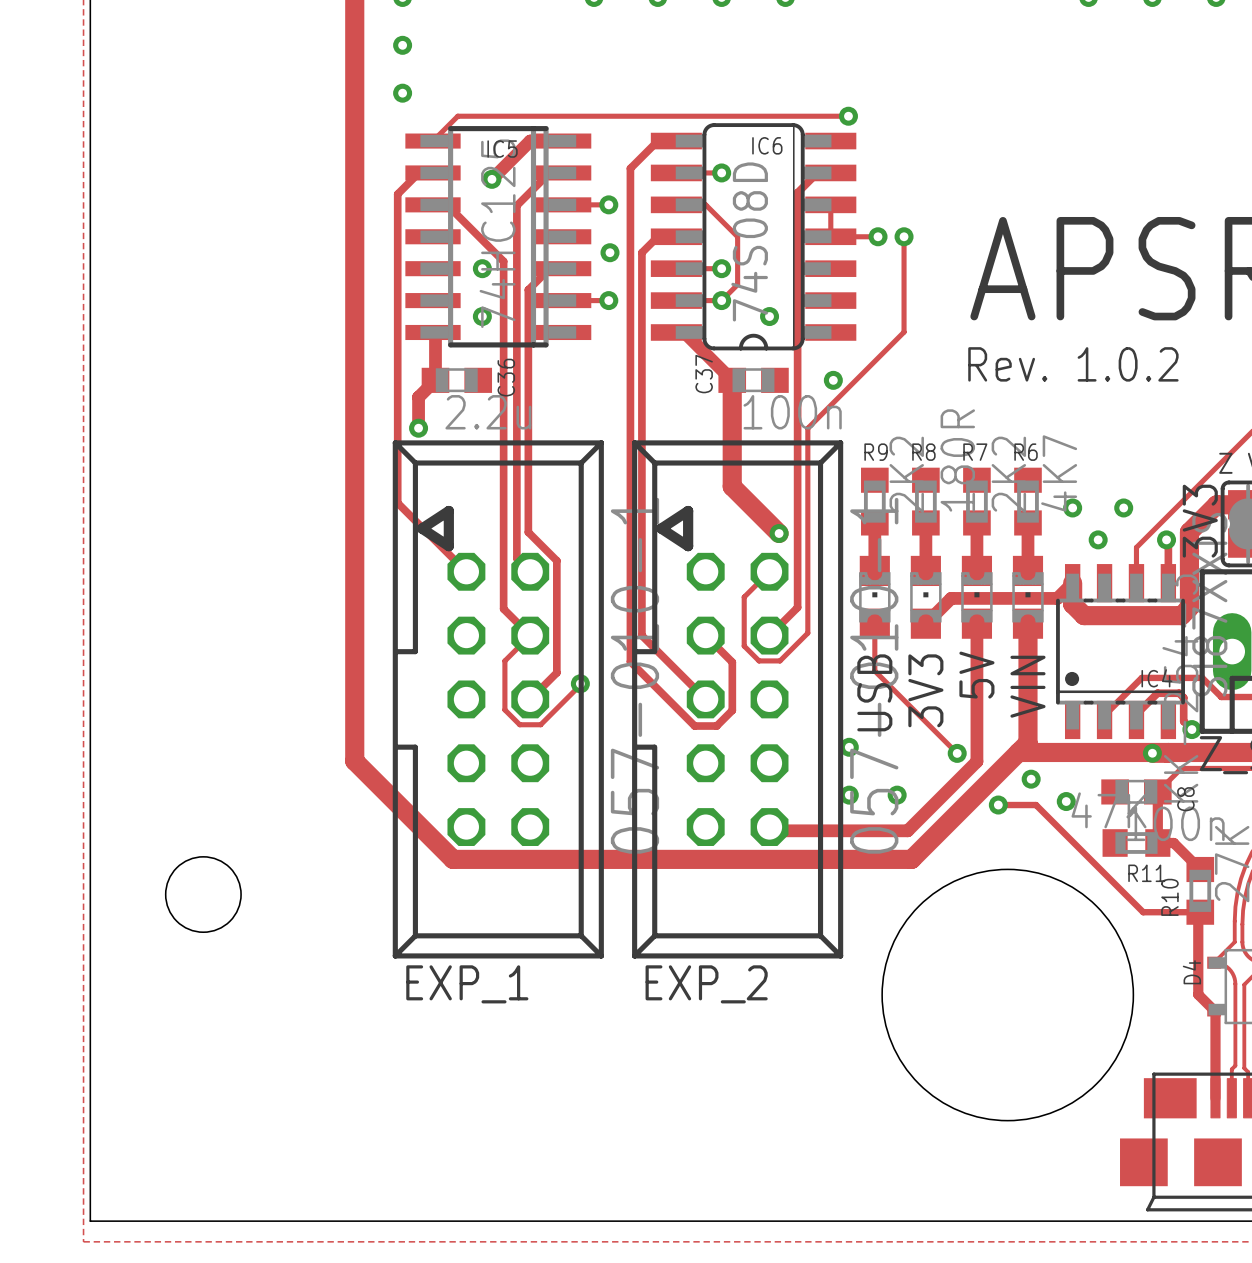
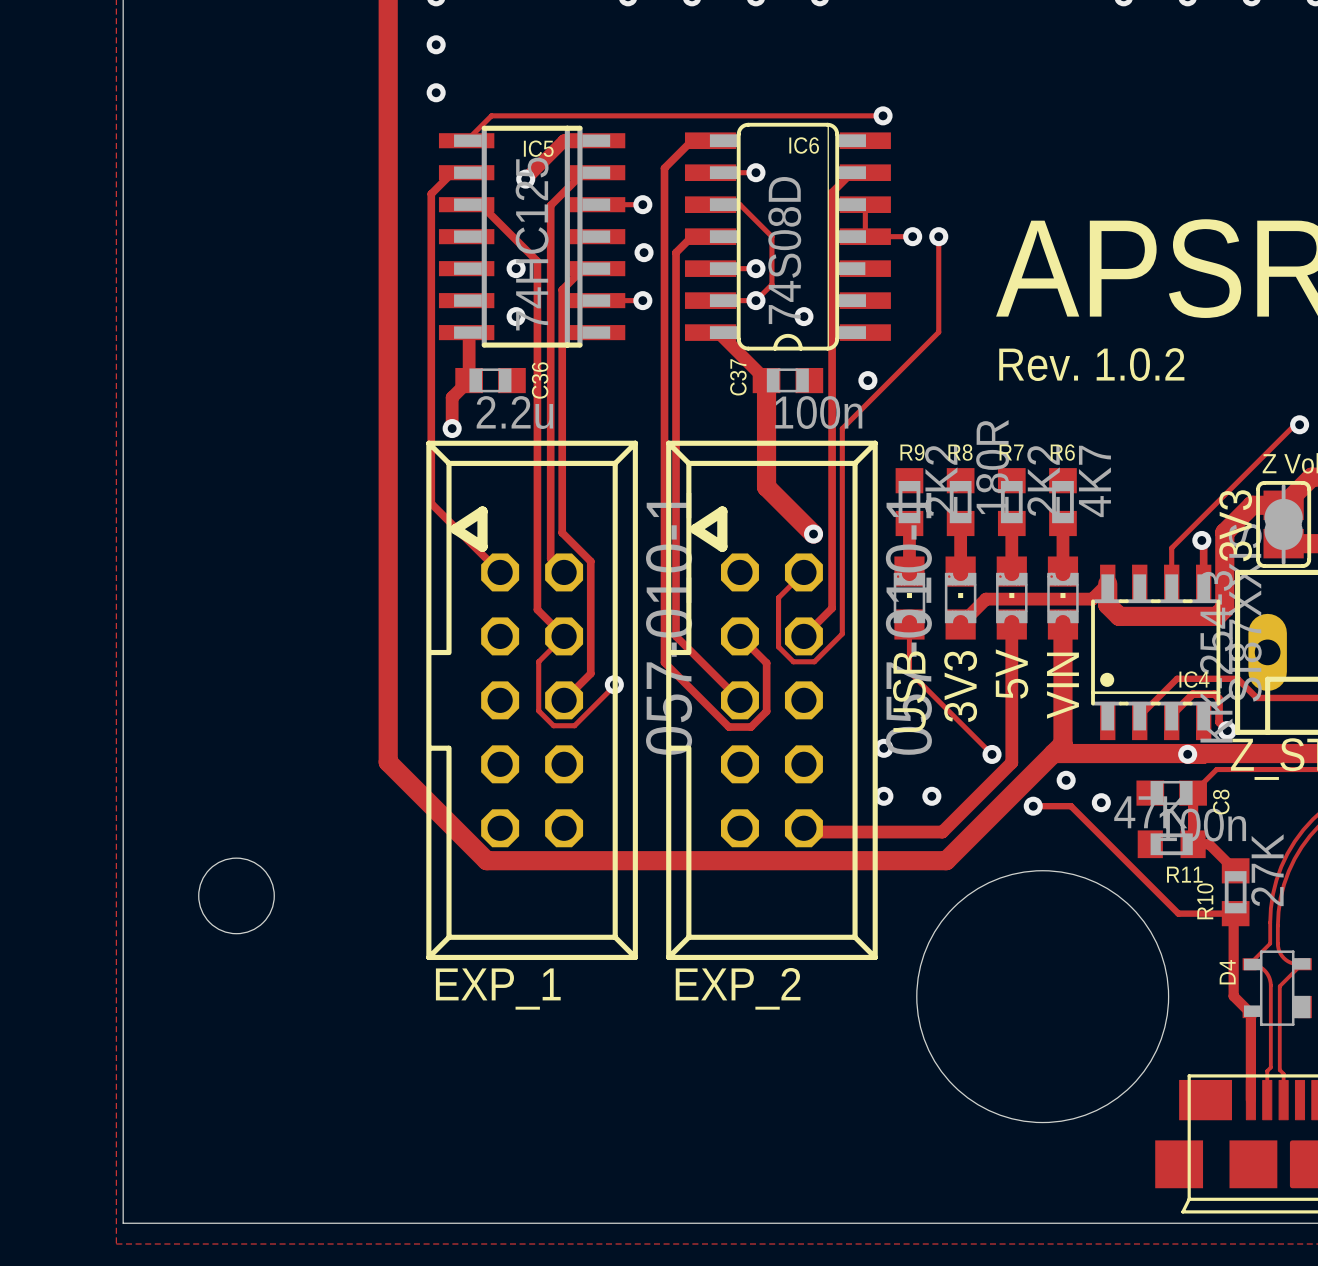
via: (1072, 507) -> none
via: (1123, 507) -> none
via: (1098, 539) -> none

